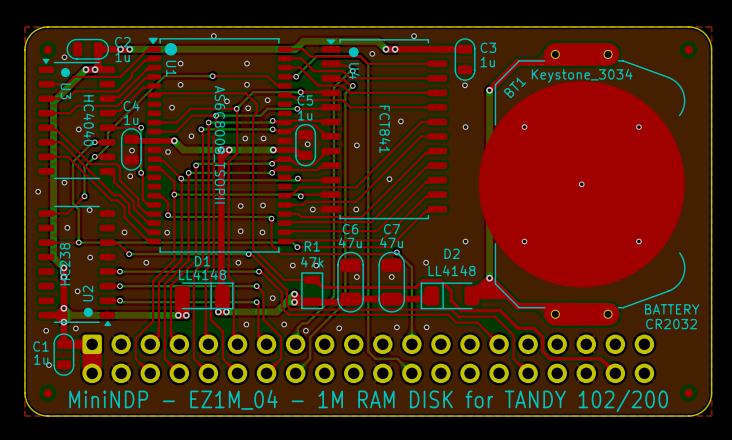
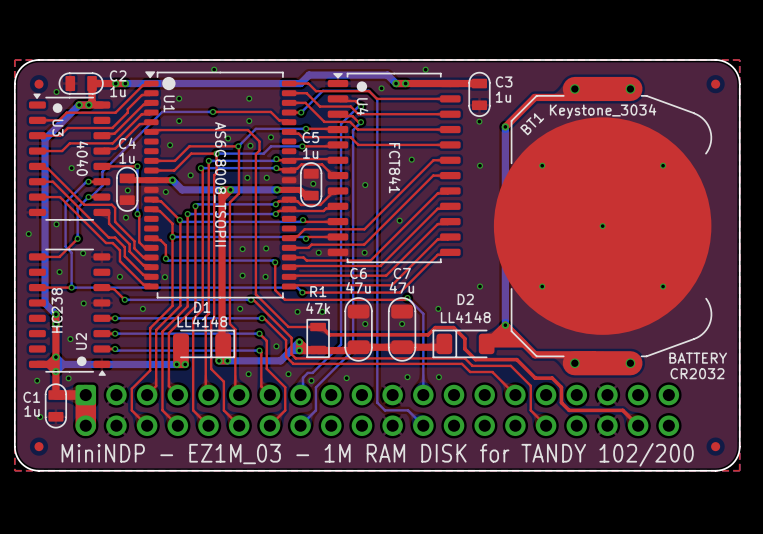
U3 value: HC4040 (88, 120) -> 4040 (82, 158)
text: MiniNDP - EZ1M_04 - 1M RAM DISK for TANDY 102/200 (368, 400) -> MiniNDP - EZ1M_03 - 1M RAM DISK for TANDY 102/200 (377, 454)

